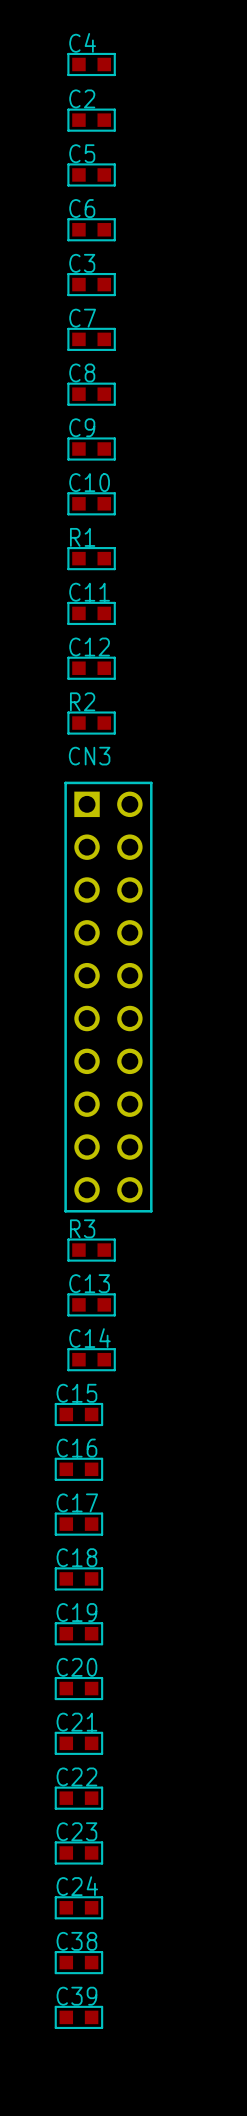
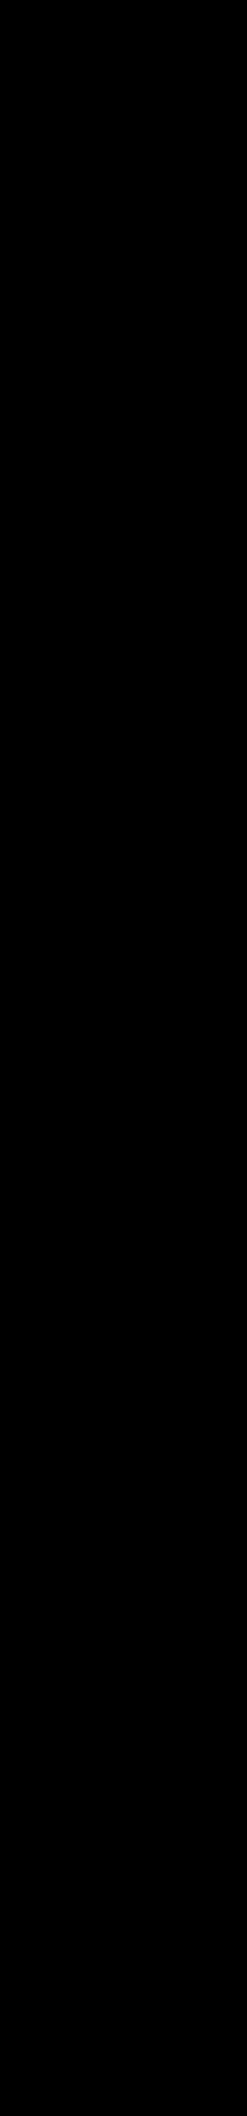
C4: (91, 64) -> none
C2: (91, 120) -> none
C5: (91, 174) -> none
C6: (91, 229) -> none
C3: (91, 284) -> none
C7: (91, 339) -> none
C8: (91, 394) -> none
C9: (91, 449) -> none
C10: (91, 503) -> none
R1: (91, 558) -> none
C11: (91, 613) -> none
C12: (91, 668) -> none
R2: (91, 723) -> none
CN3: (108, 997) -> none
R3: (91, 1250) -> none
C13: (91, 1304) -> none
C14: (91, 1359) -> none
C15: (78, 1414) -> none
C16: (78, 1469) -> none
C17: (78, 1524) -> none
C18: (78, 1578) -> none
C19: (78, 1633) -> none
C20: (78, 1688) -> none
C21: (78, 1743) -> none
C22: (78, 1798) -> none
C23: (78, 1852) -> none
C24: (78, 1907) -> none
C38: (78, 1962) -> none
C39: (78, 2017) -> none

